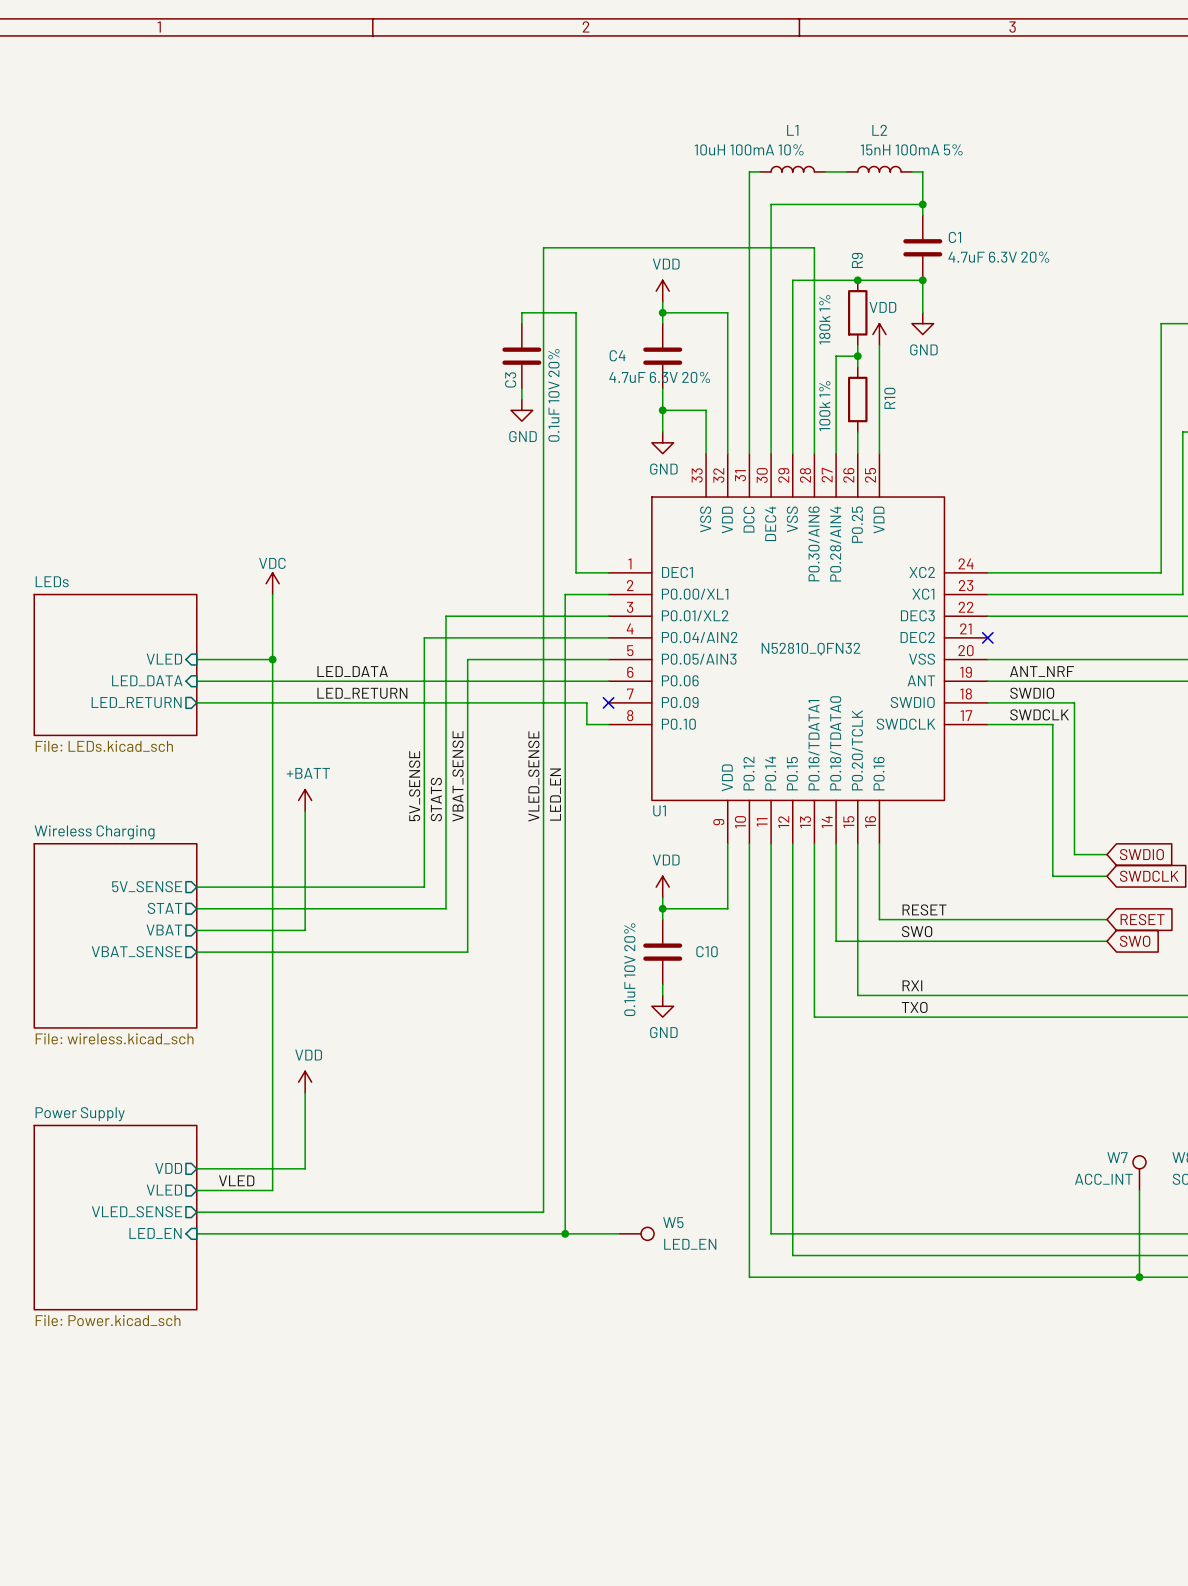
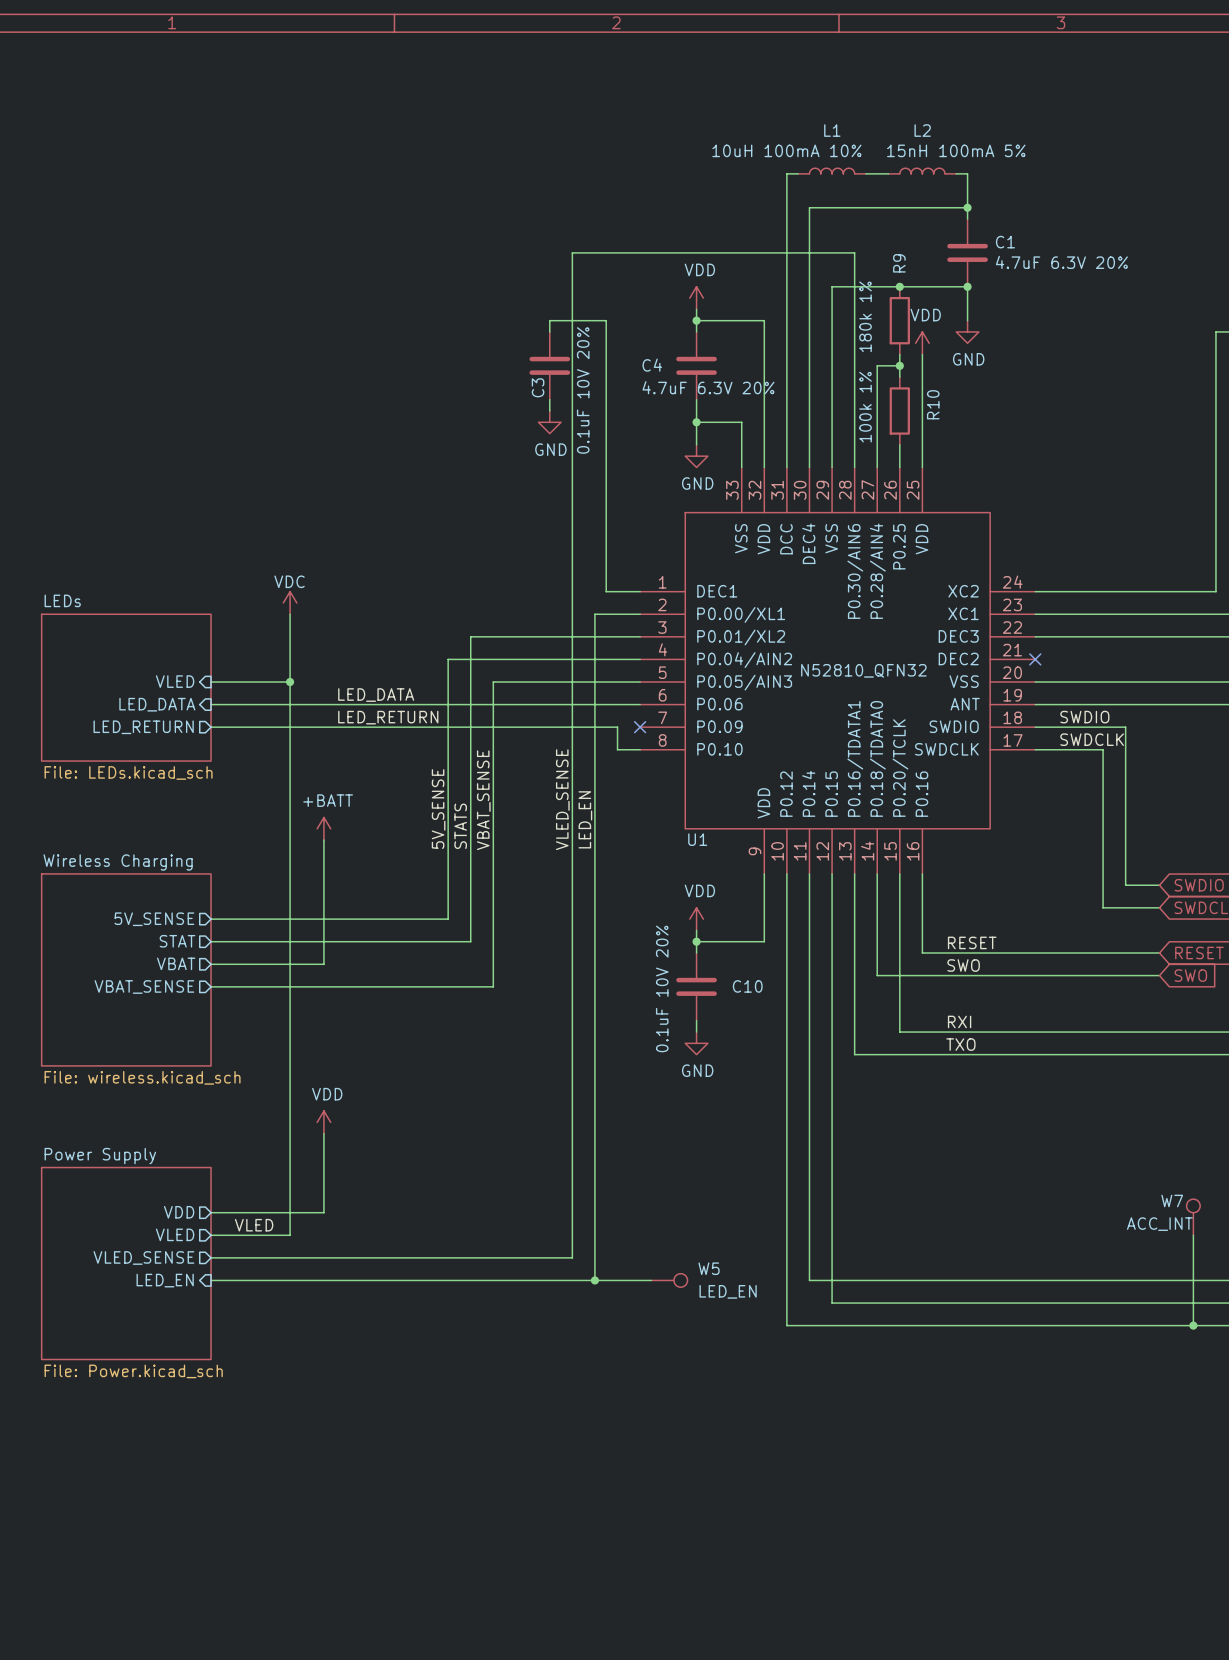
label: ANT_NRF (1041, 671) -> none

